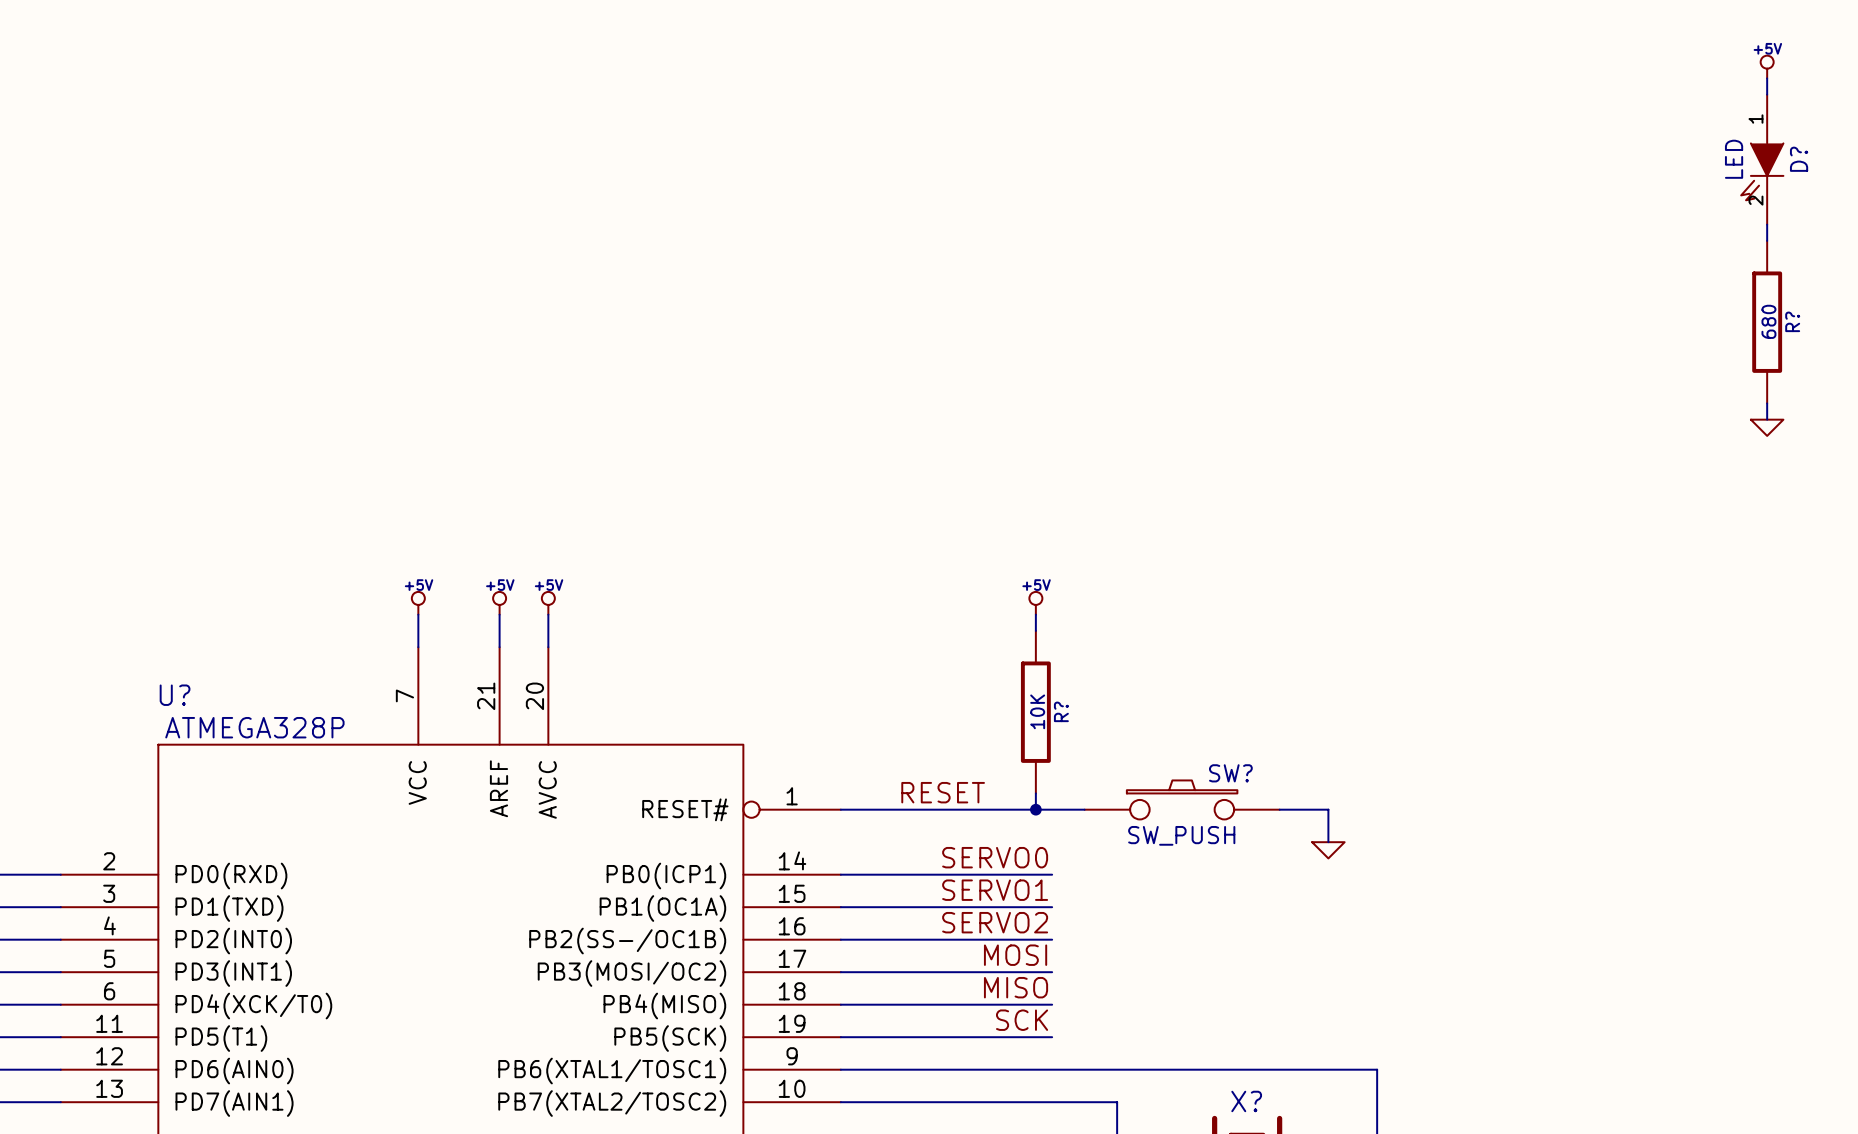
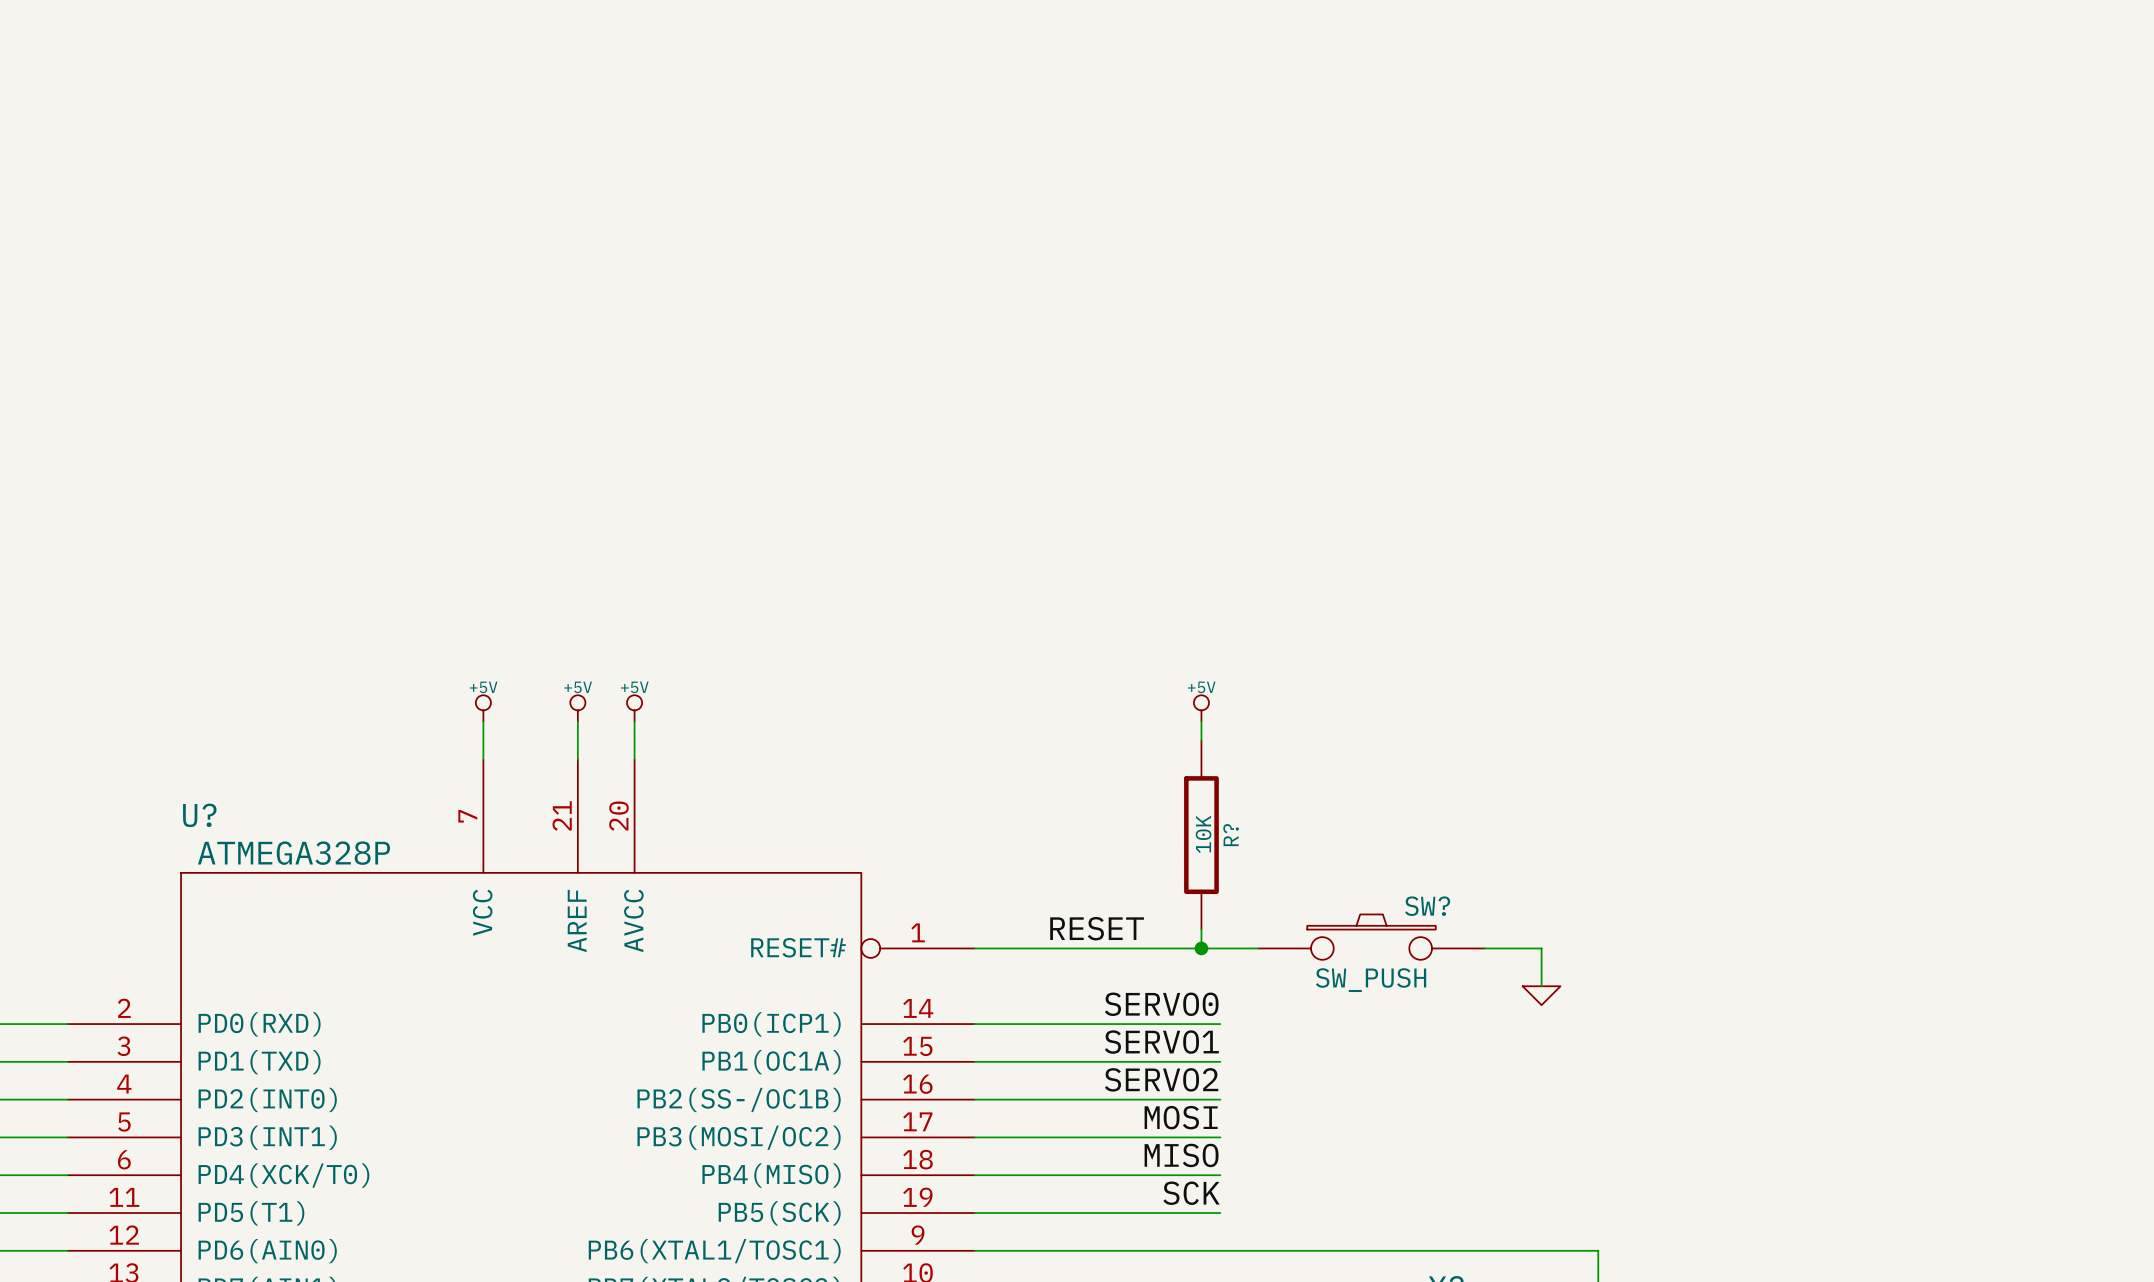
power symbol: +5V (1767, 67) -> none
wire: (1767, 78) (1767, 94) -> none
D?: LED (1762, 159) -> none
wire: (1767, 224) (1767, 240) -> none
R?: 680 (1767, 322) -> none
wire: (1767, 403) (1767, 419) -> none
power symbol: (1767, 427) -> none

